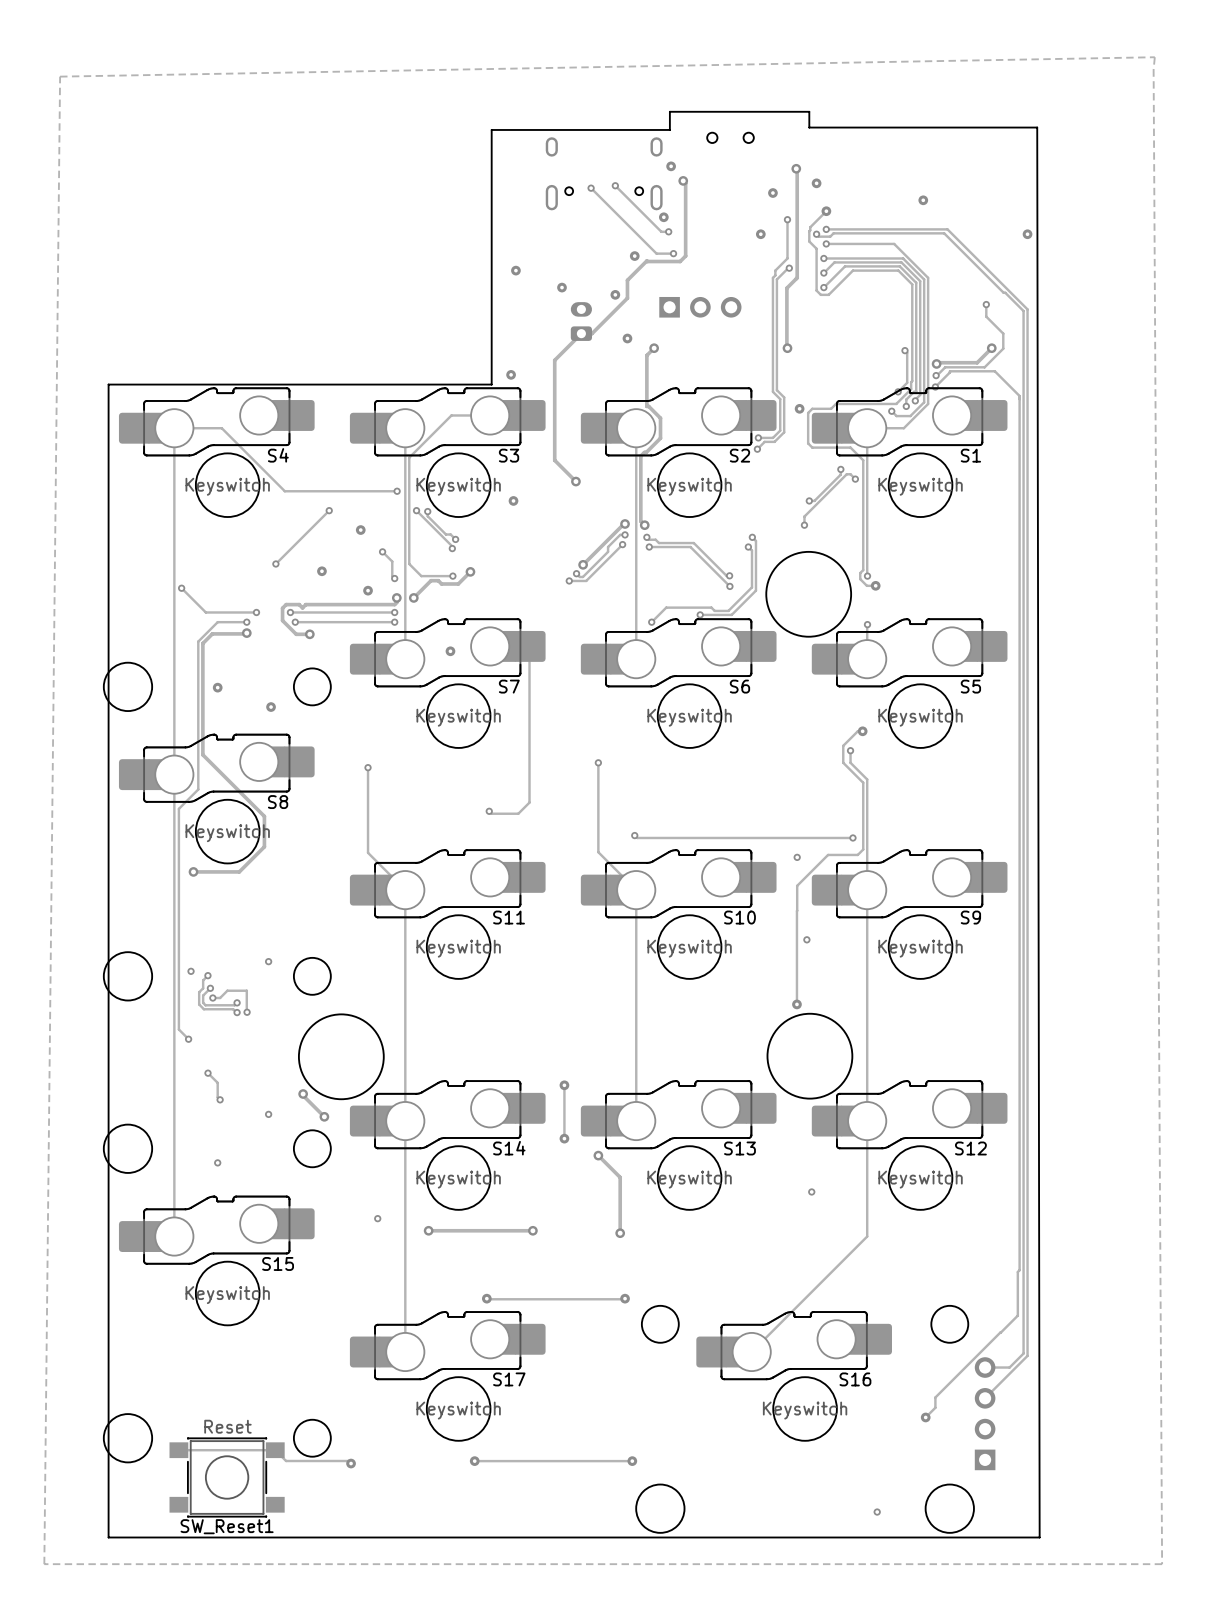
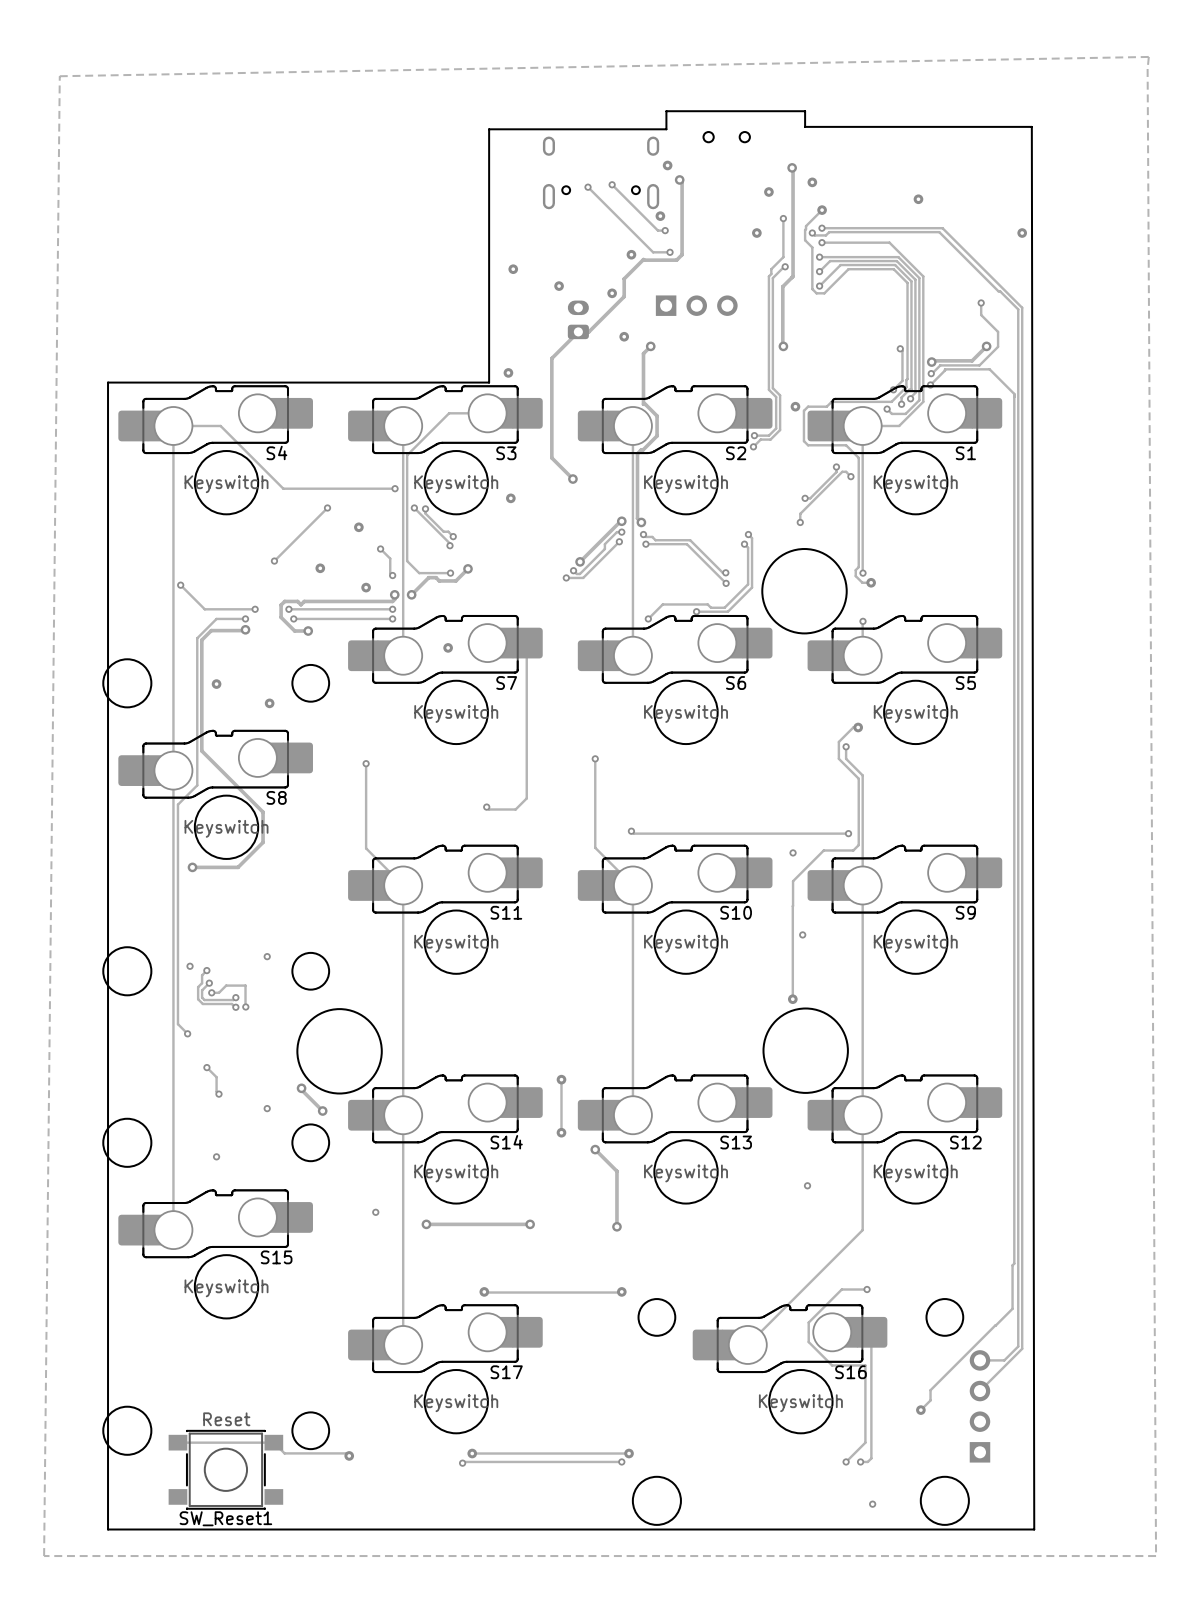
track: none -> (867, 1289) (841, 1289) (808, 1322) (808, 1342) (832, 1365) (865, 1365) (865, 1442) (846, 1461)
via: none -> (867, 1289)
track: none -> (871, 1332) (871, 1458) (867, 1461) (860, 1461)
track: none -> (621, 1461) (462, 1463)
via: none -> (621, 1461)
via: none -> (846, 1461)
via: none -> (860, 1461)
via: none -> (462, 1463)

